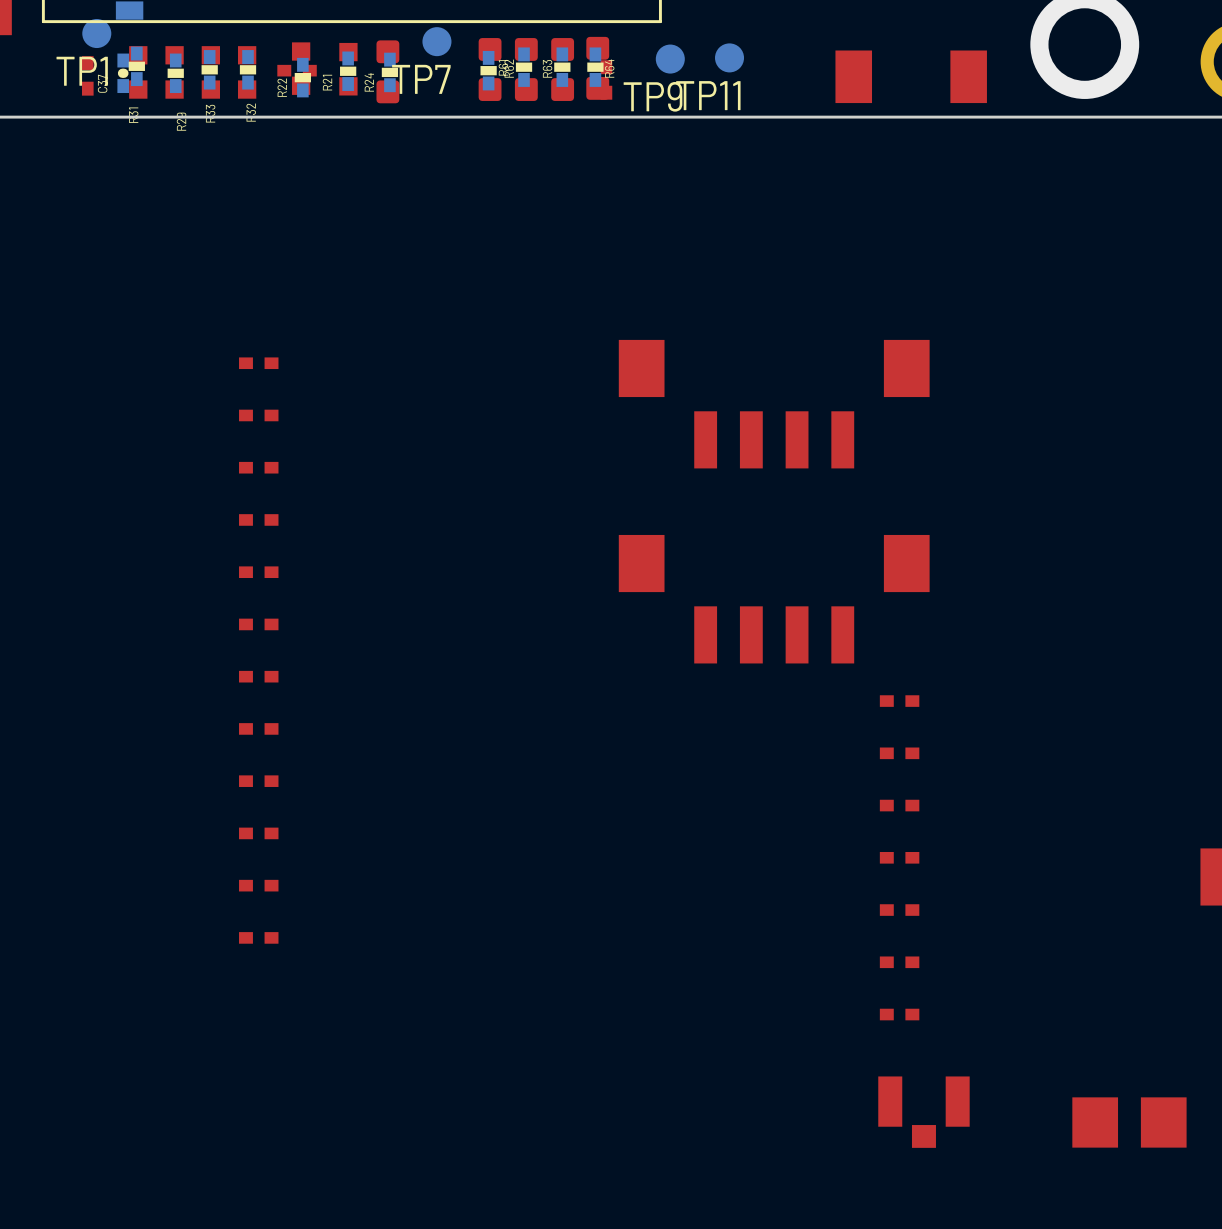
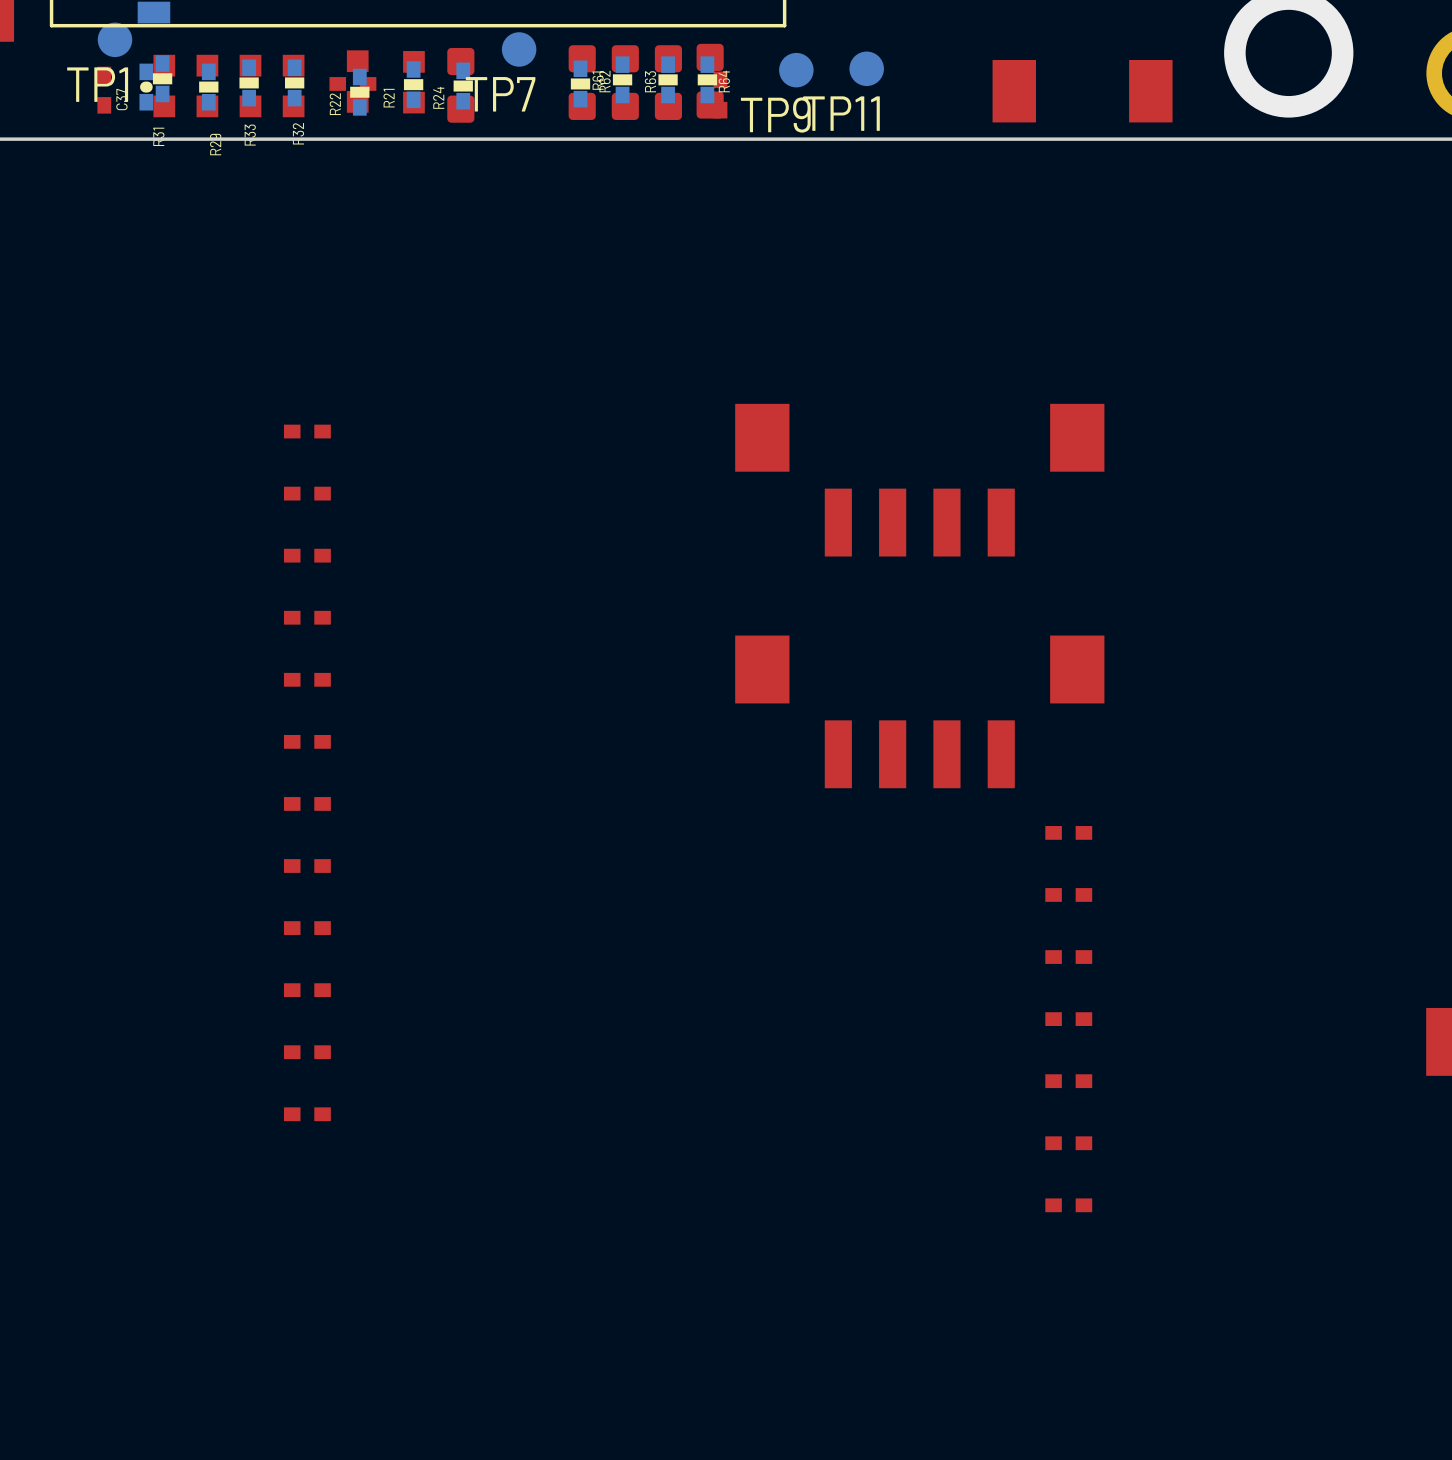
part: (923, 1112) -> none
part: (1129, 1122) -> none

